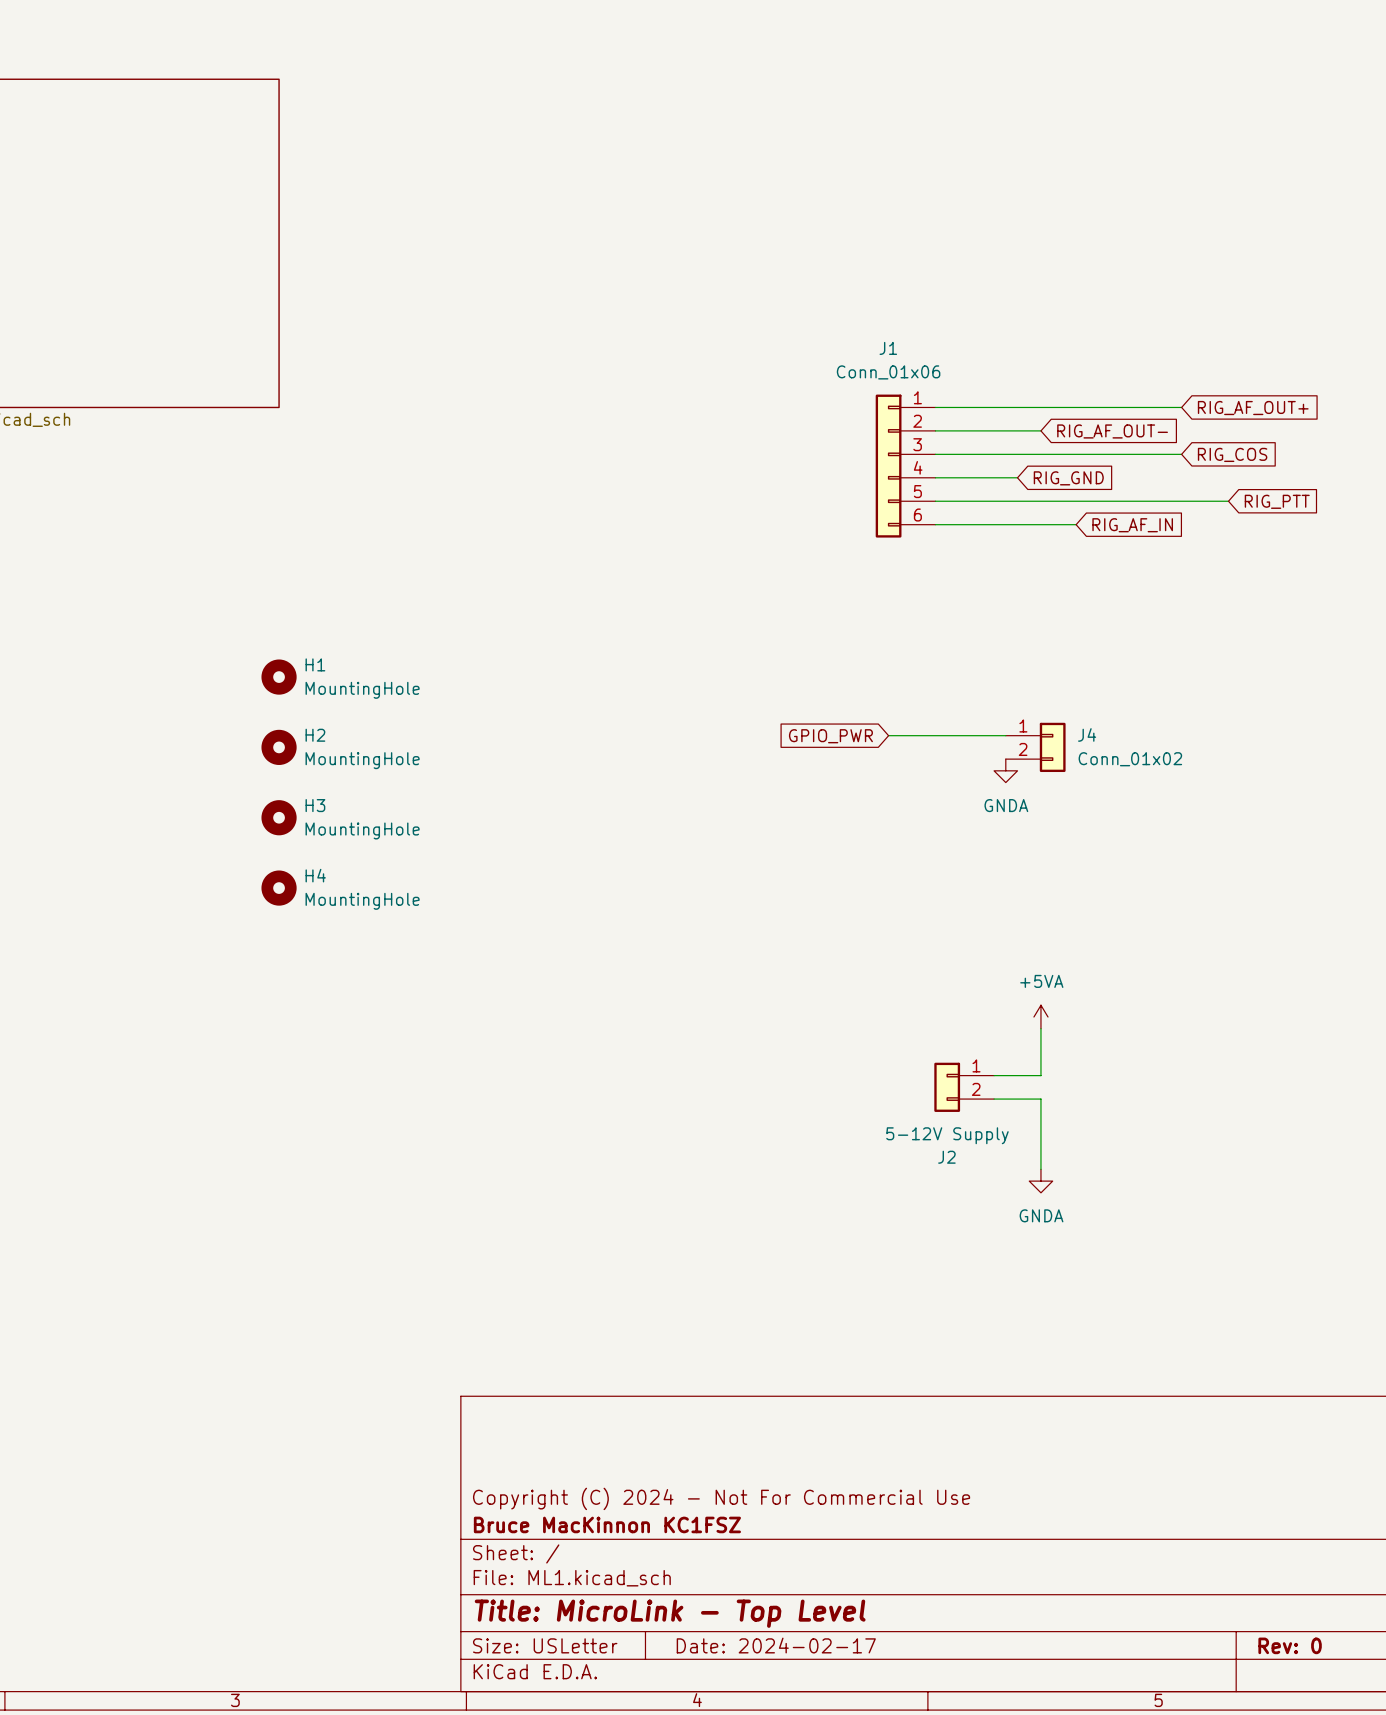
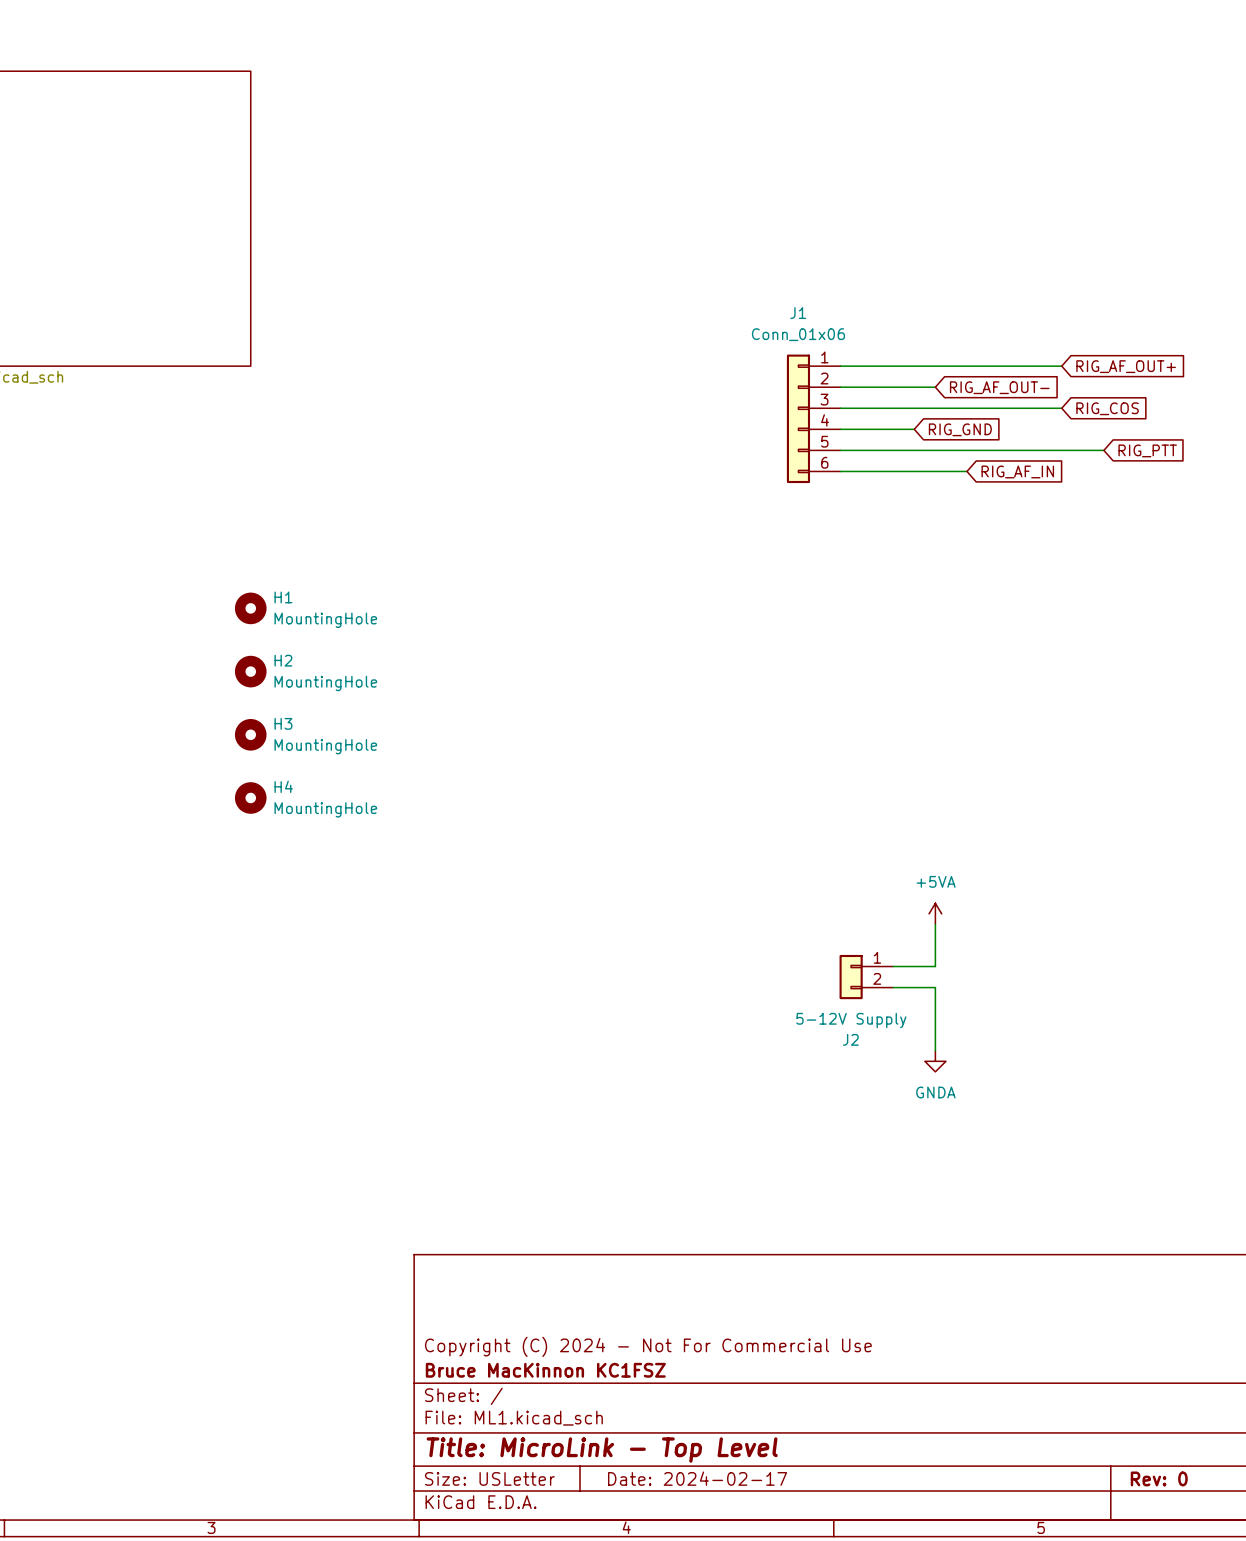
wire: (888, 735) (1005, 735) -> none
global label: GPIO_PWR (830, 736) -> none
J4: Conn_01x02 (1035, 747) -> none
power symbol: GNDA (1005, 770) -> none

